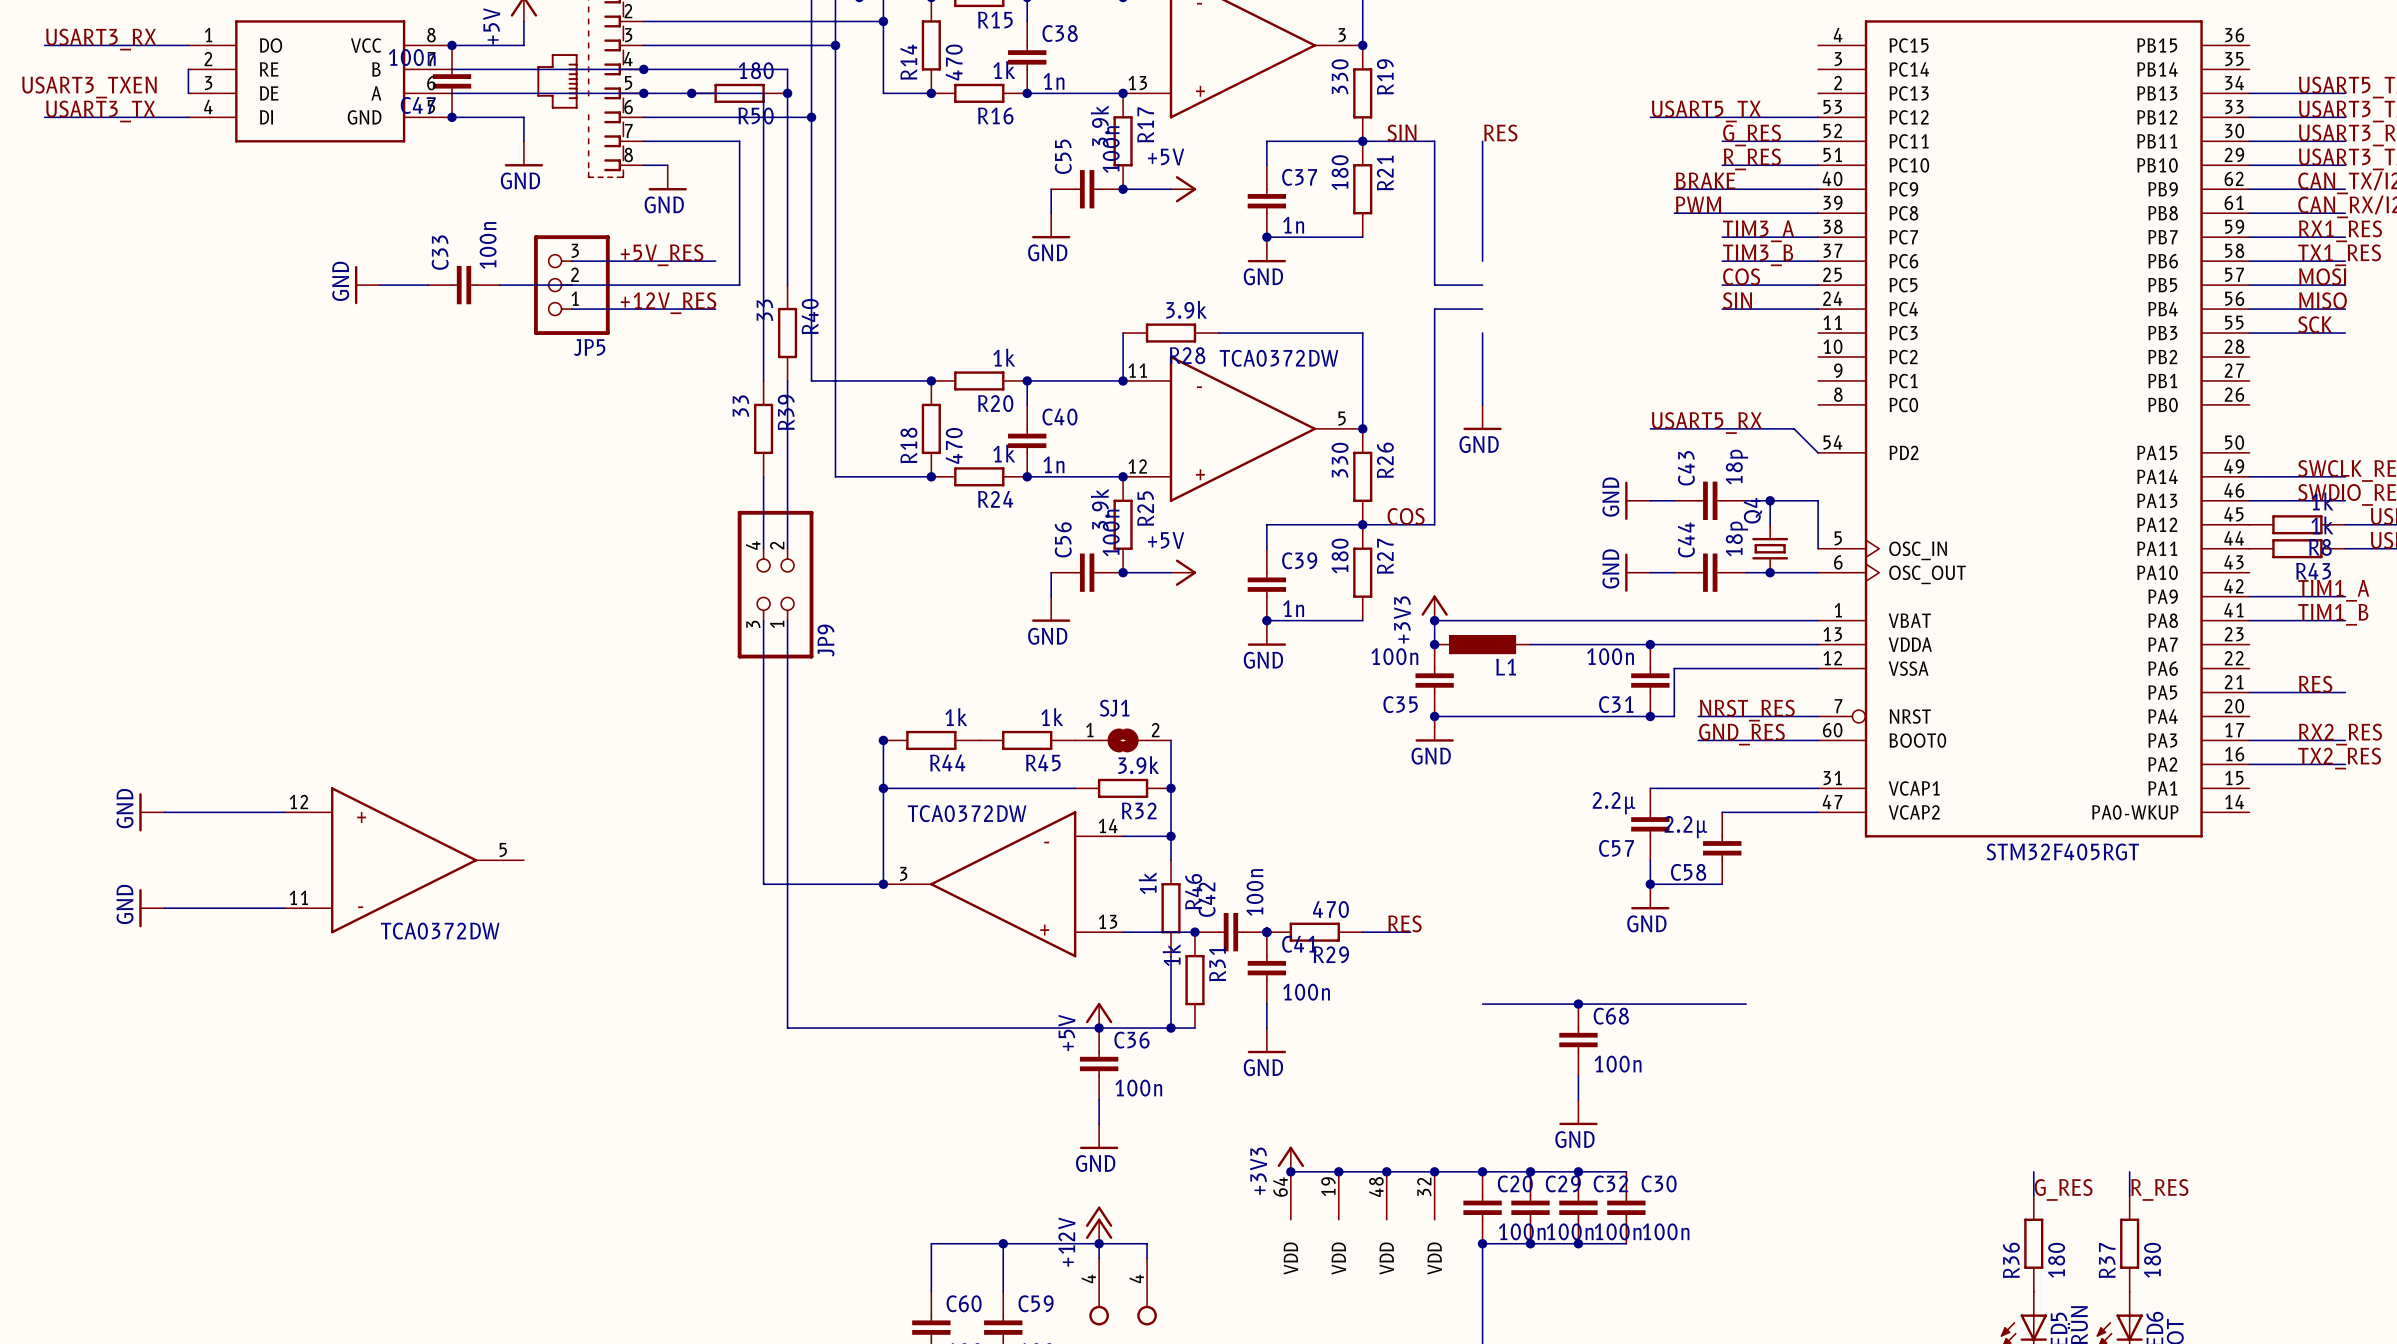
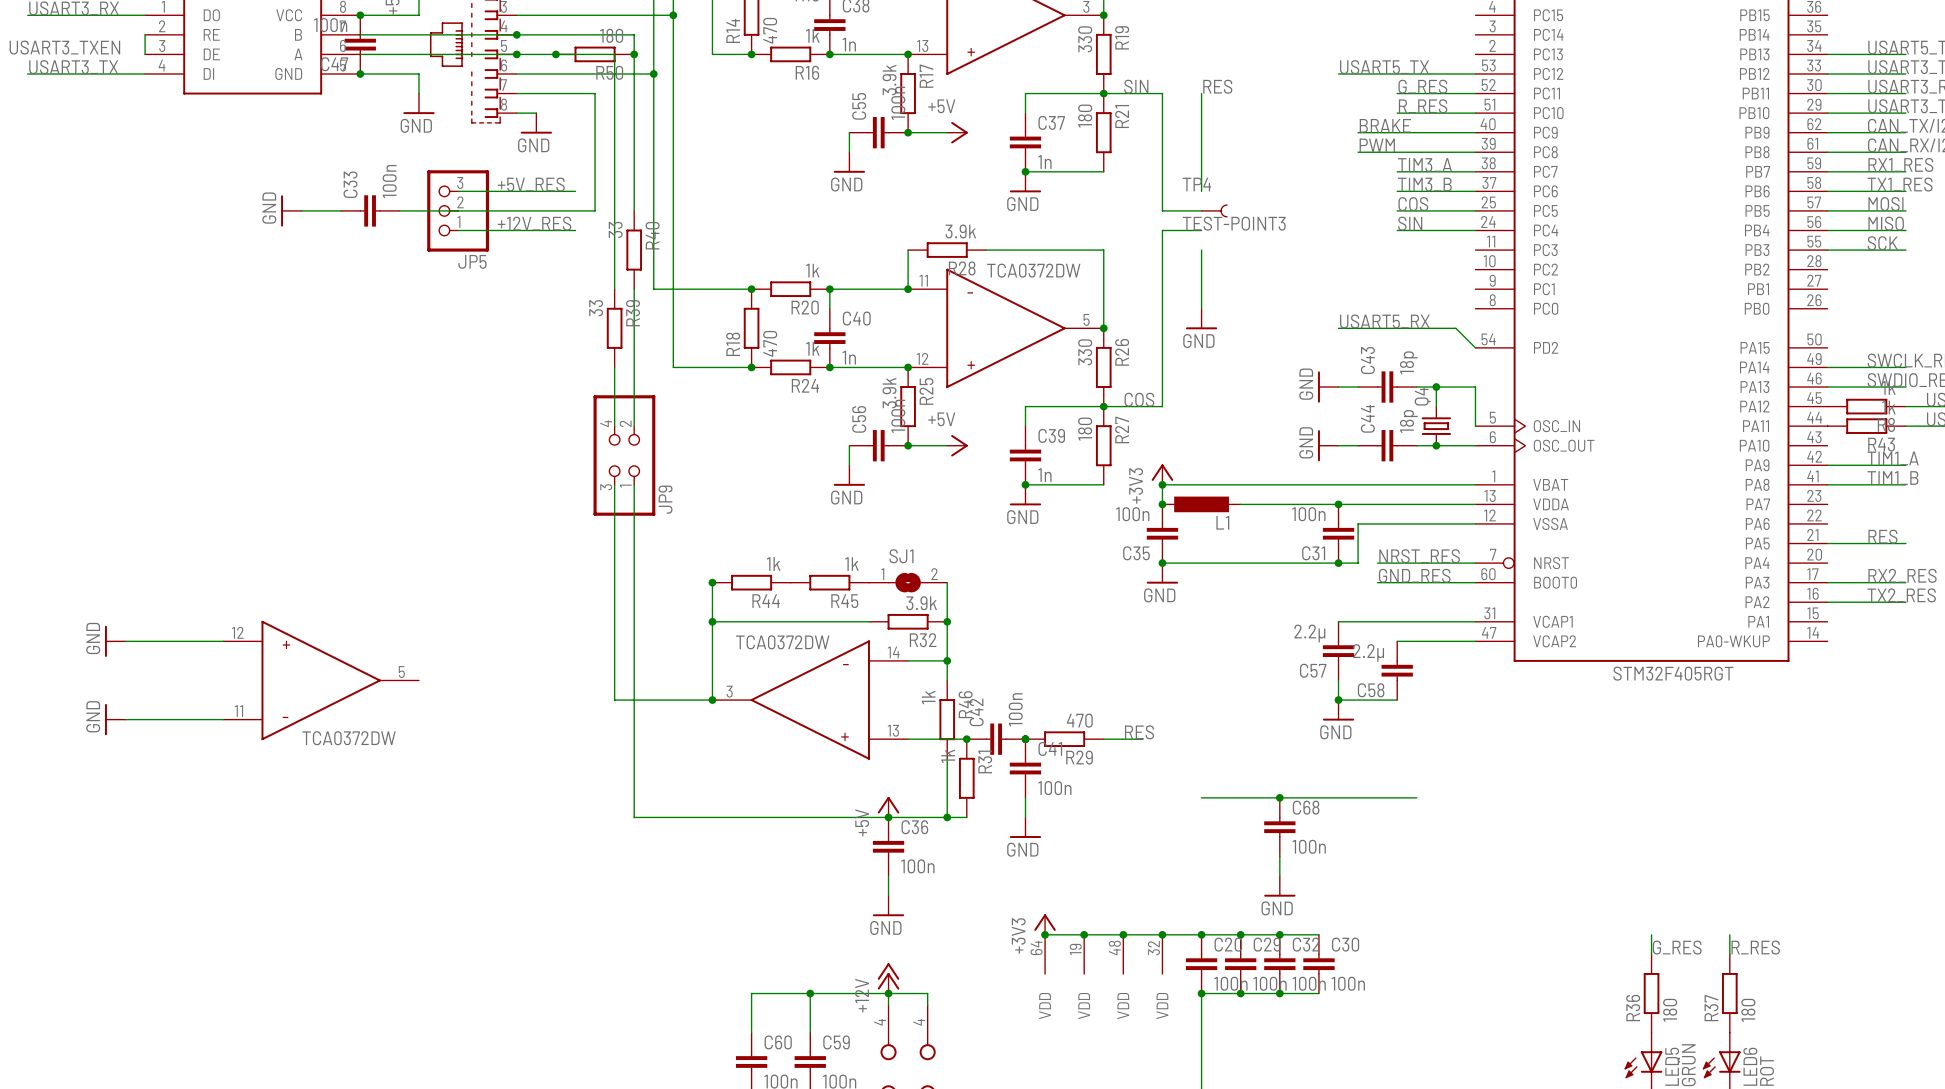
TP4: none -> TEST-POINT3 (1214, 210)

